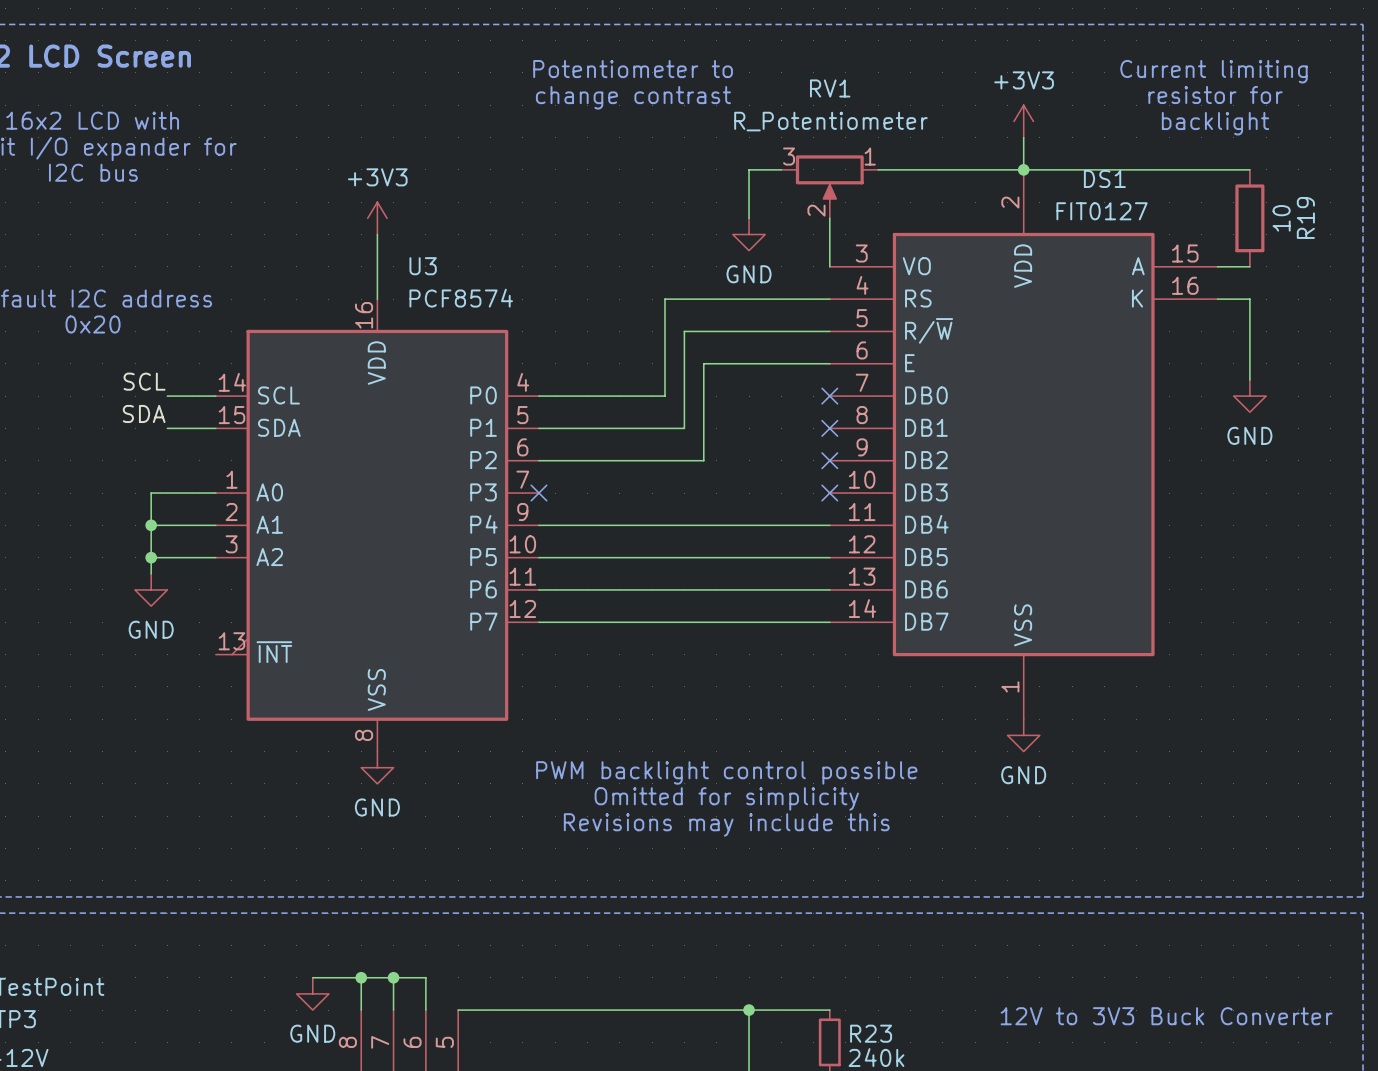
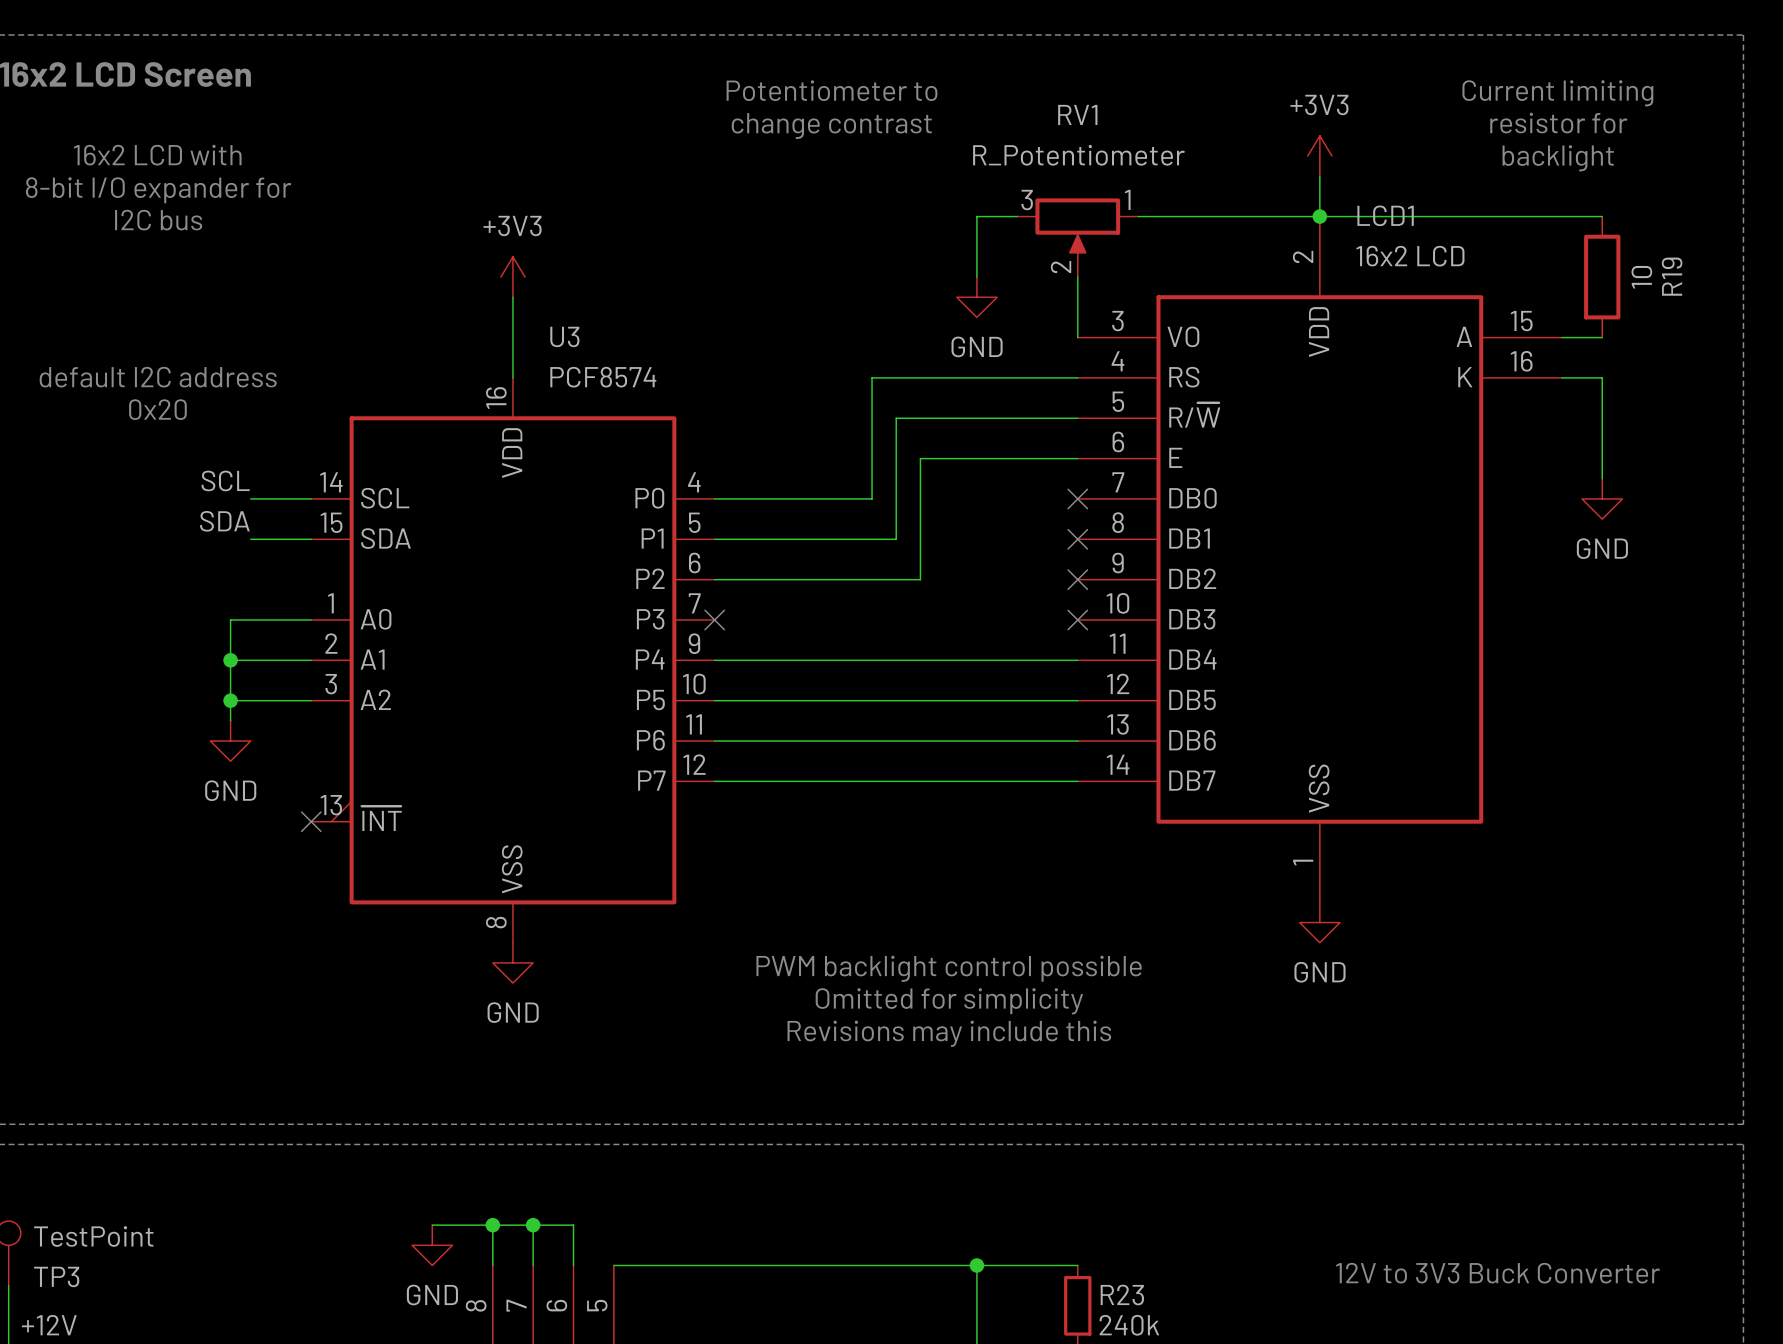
DS1 name: DS1 (1104, 178) -> LCD1 (1385, 215)
DS1 value: FIT0127 (1102, 211) -> 16x2 LCD (1410, 256)
no-connect mark: none -> (311, 821)

